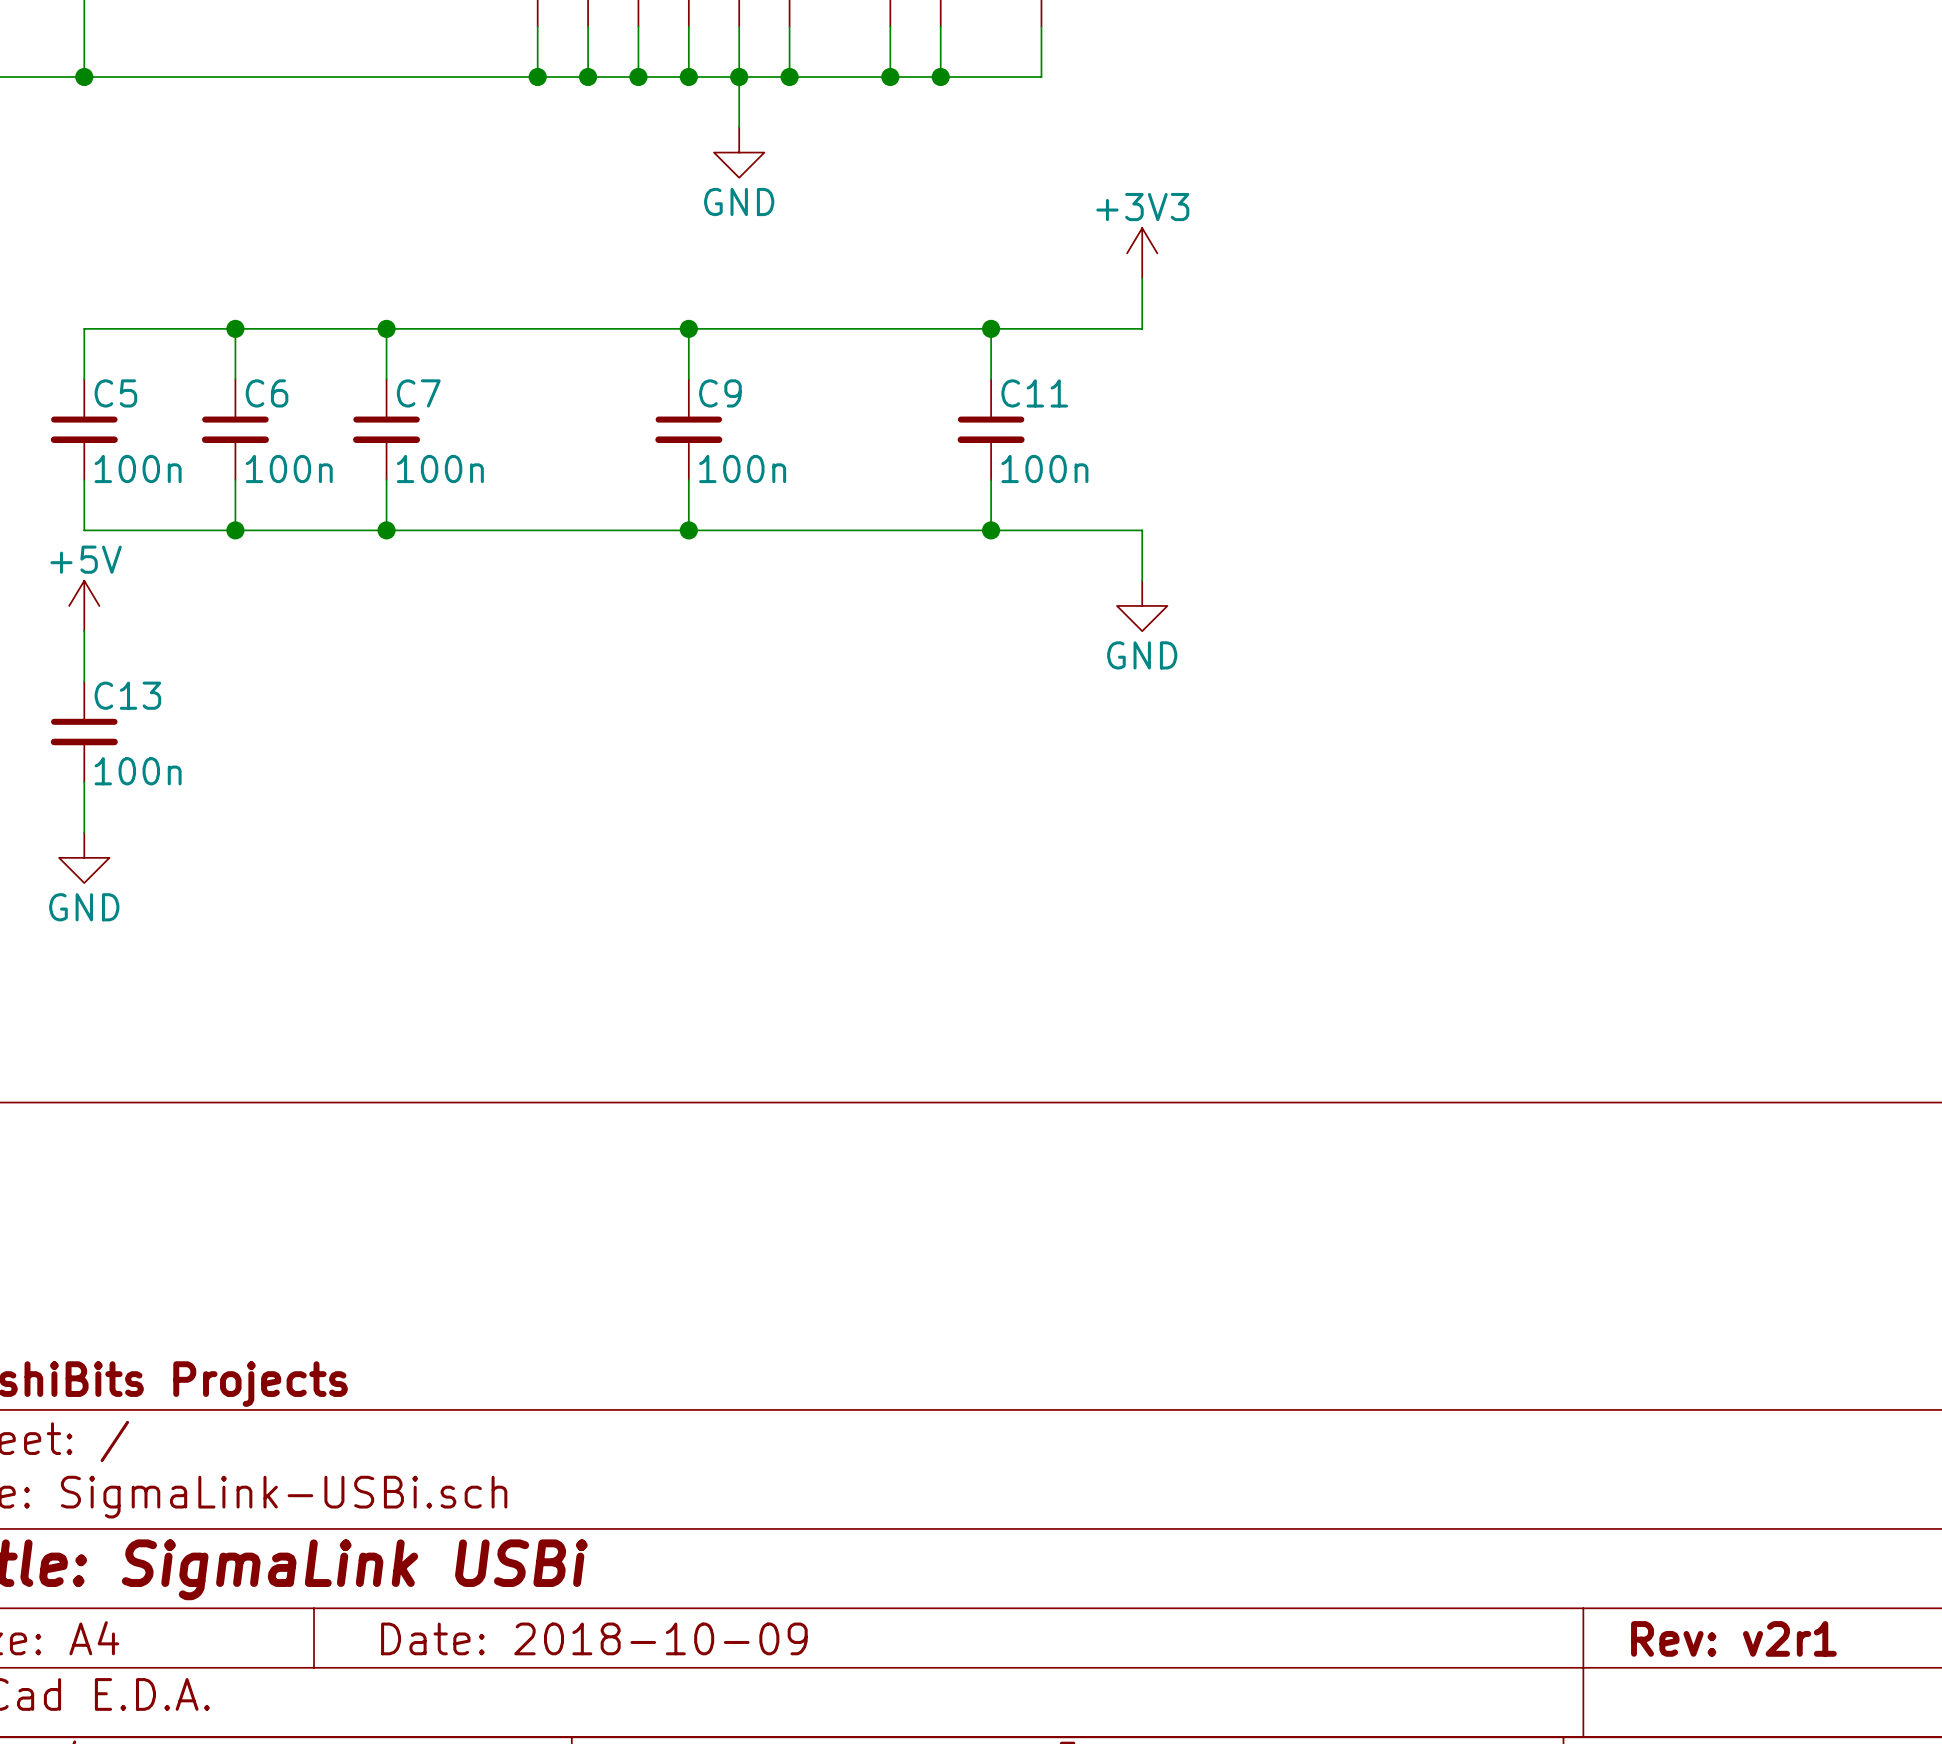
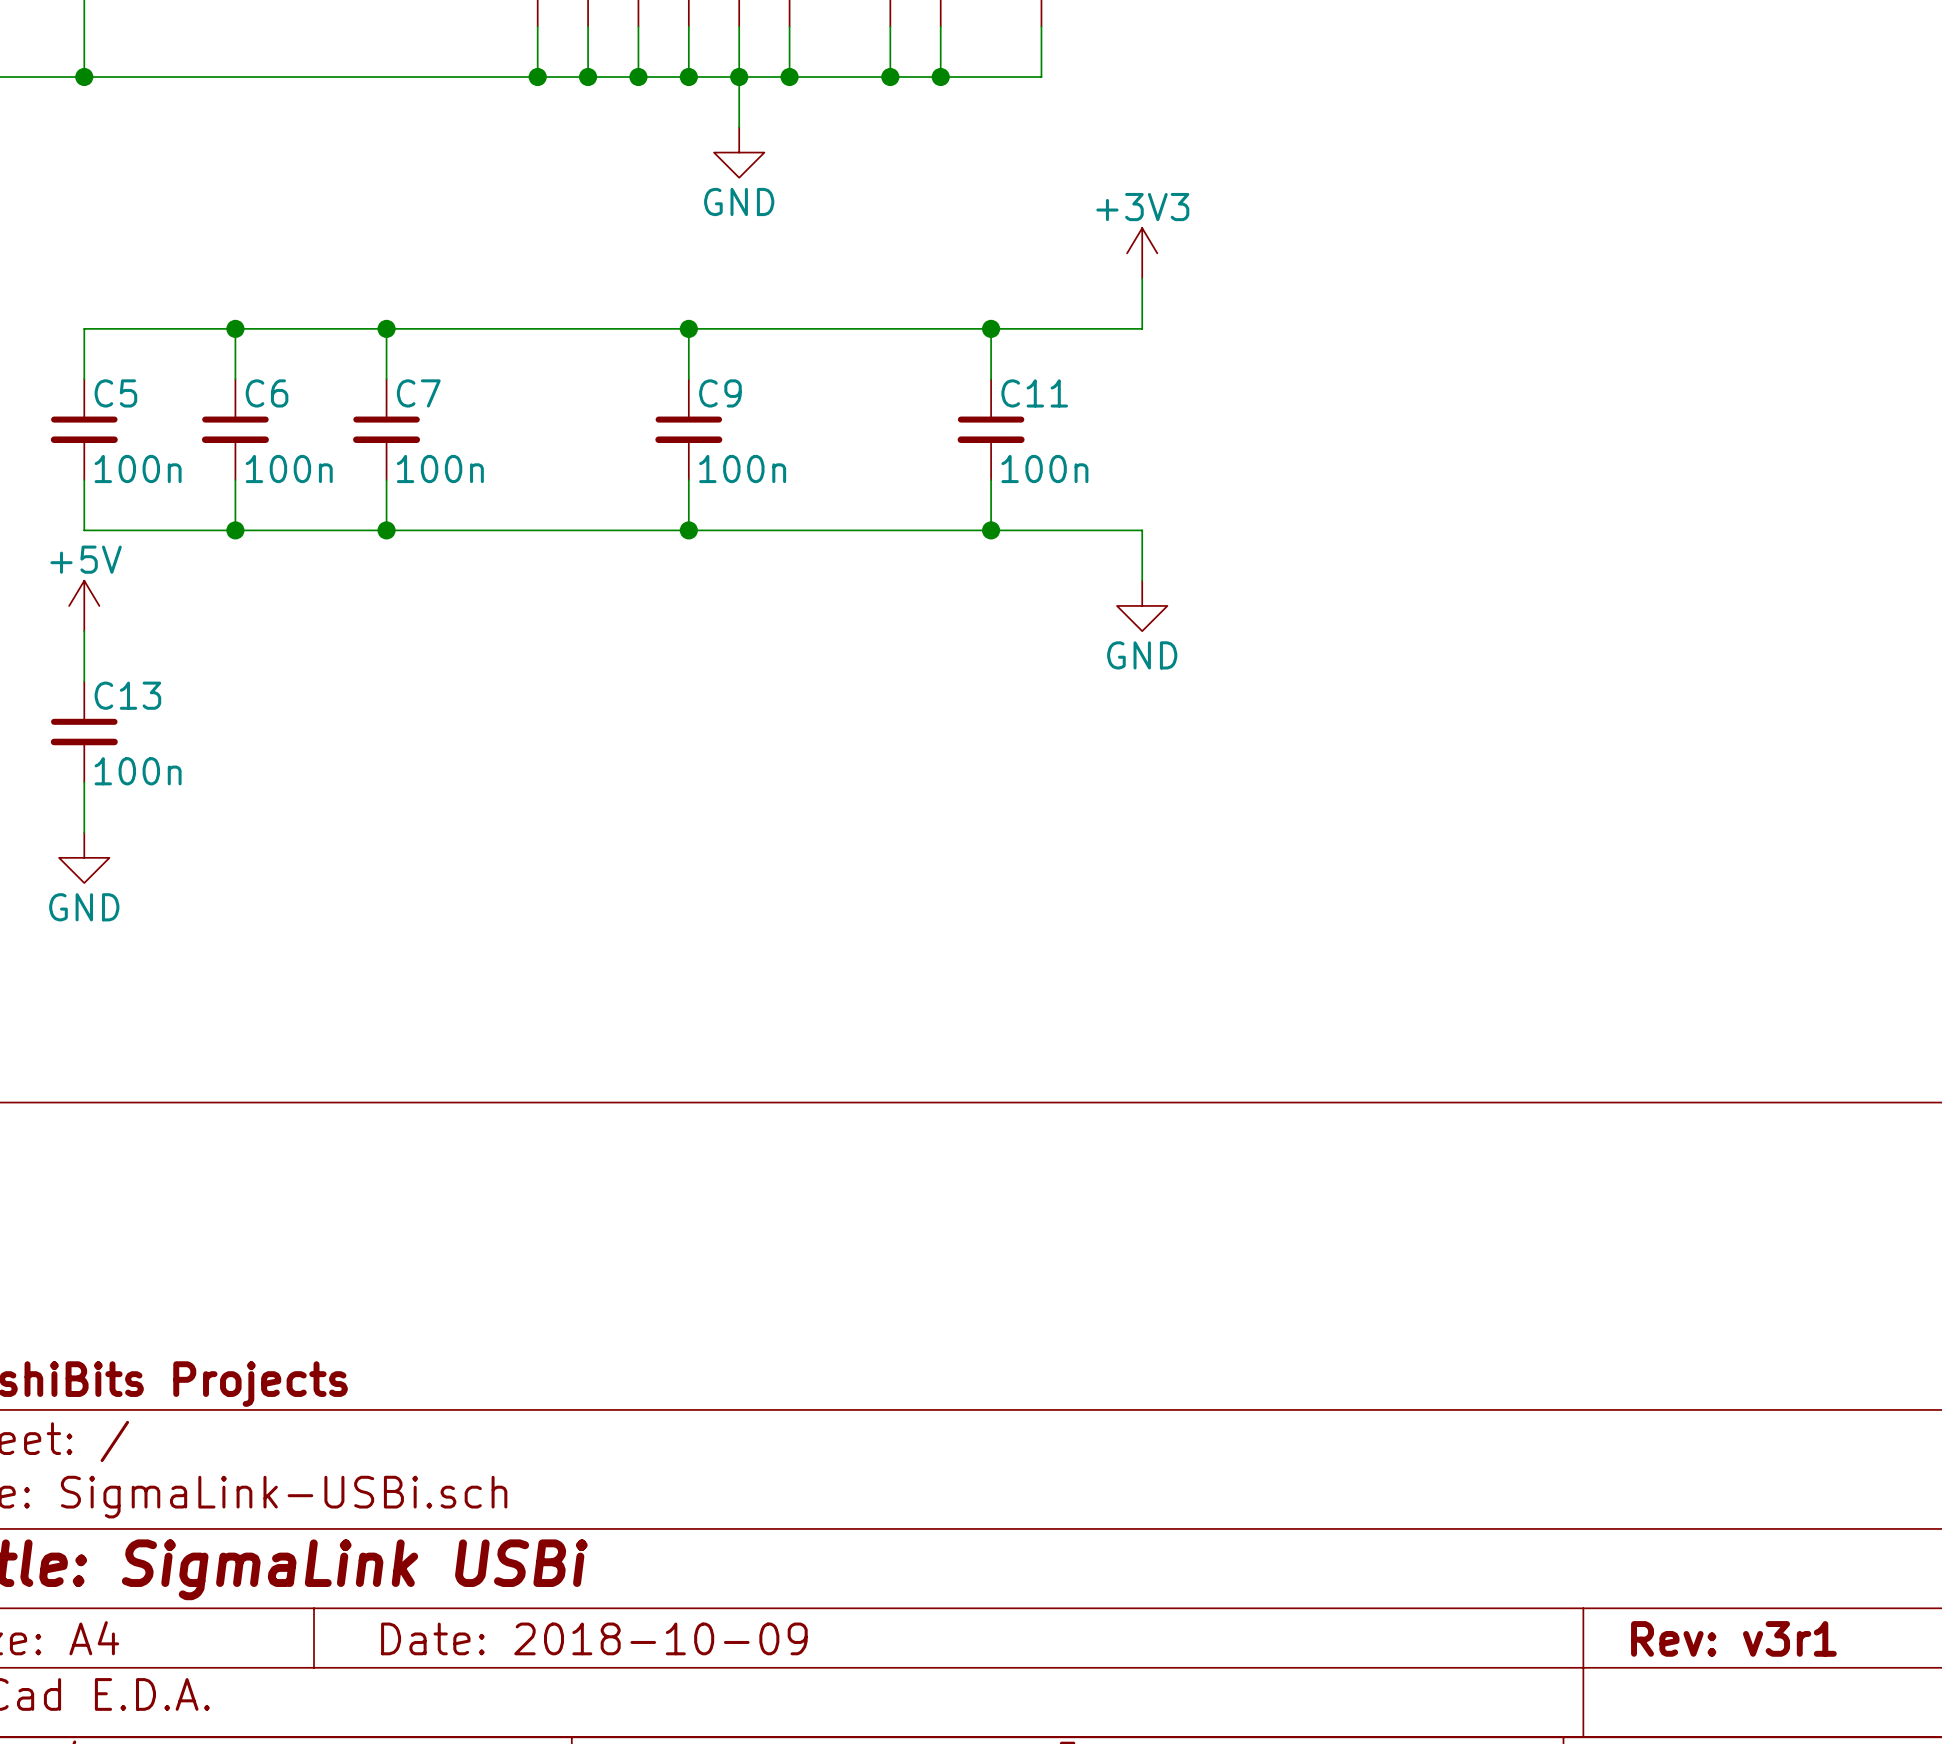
title block: Rev: v2r1 (1733, 1638) -> Rev: v3r1 (1733, 1638)

